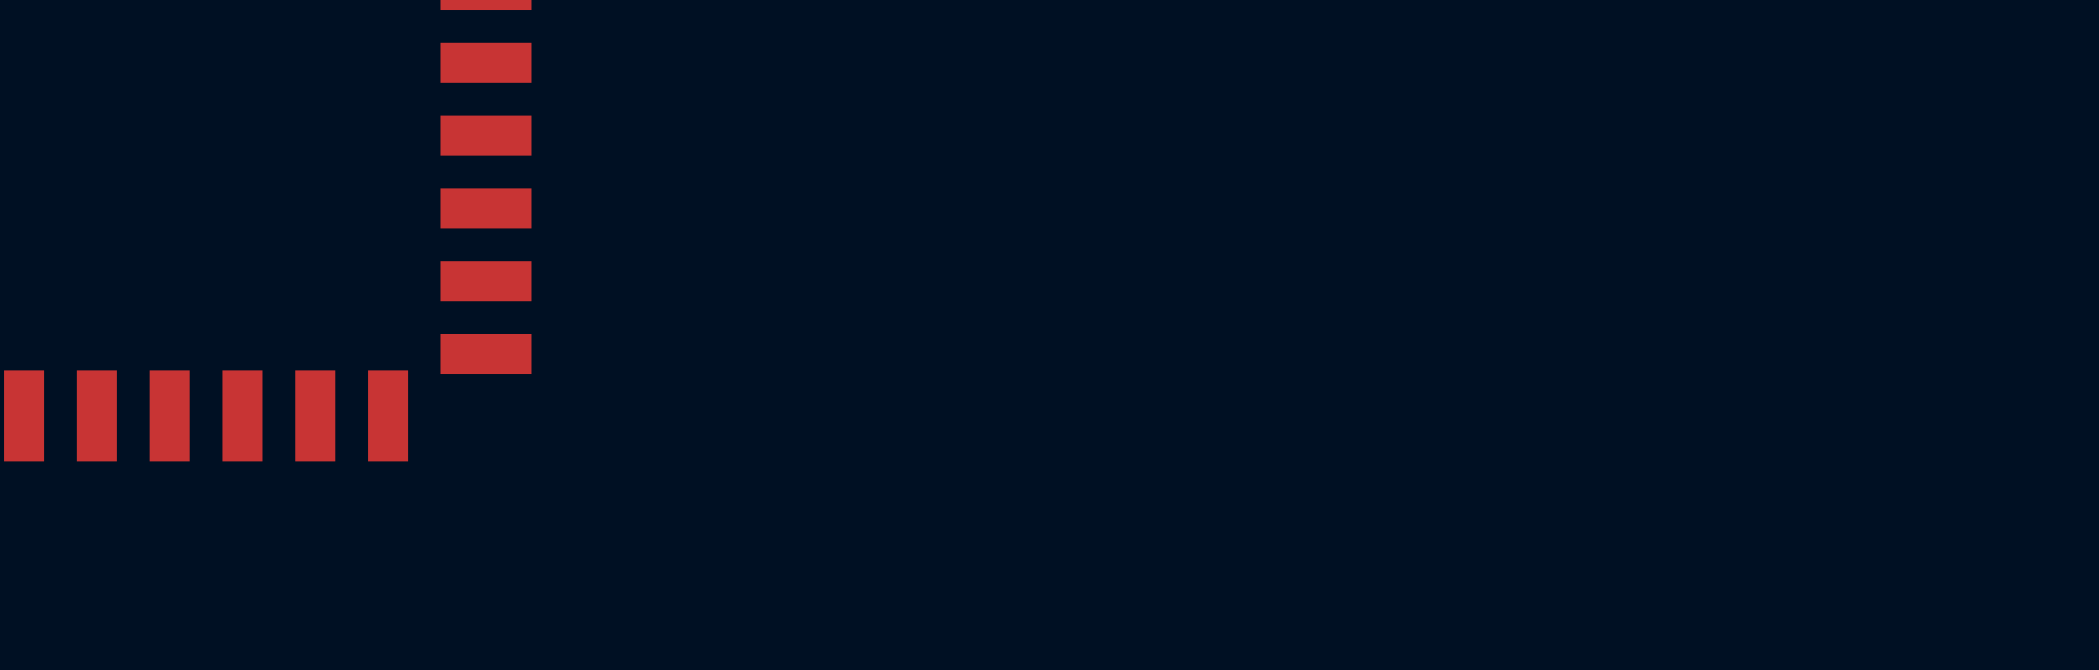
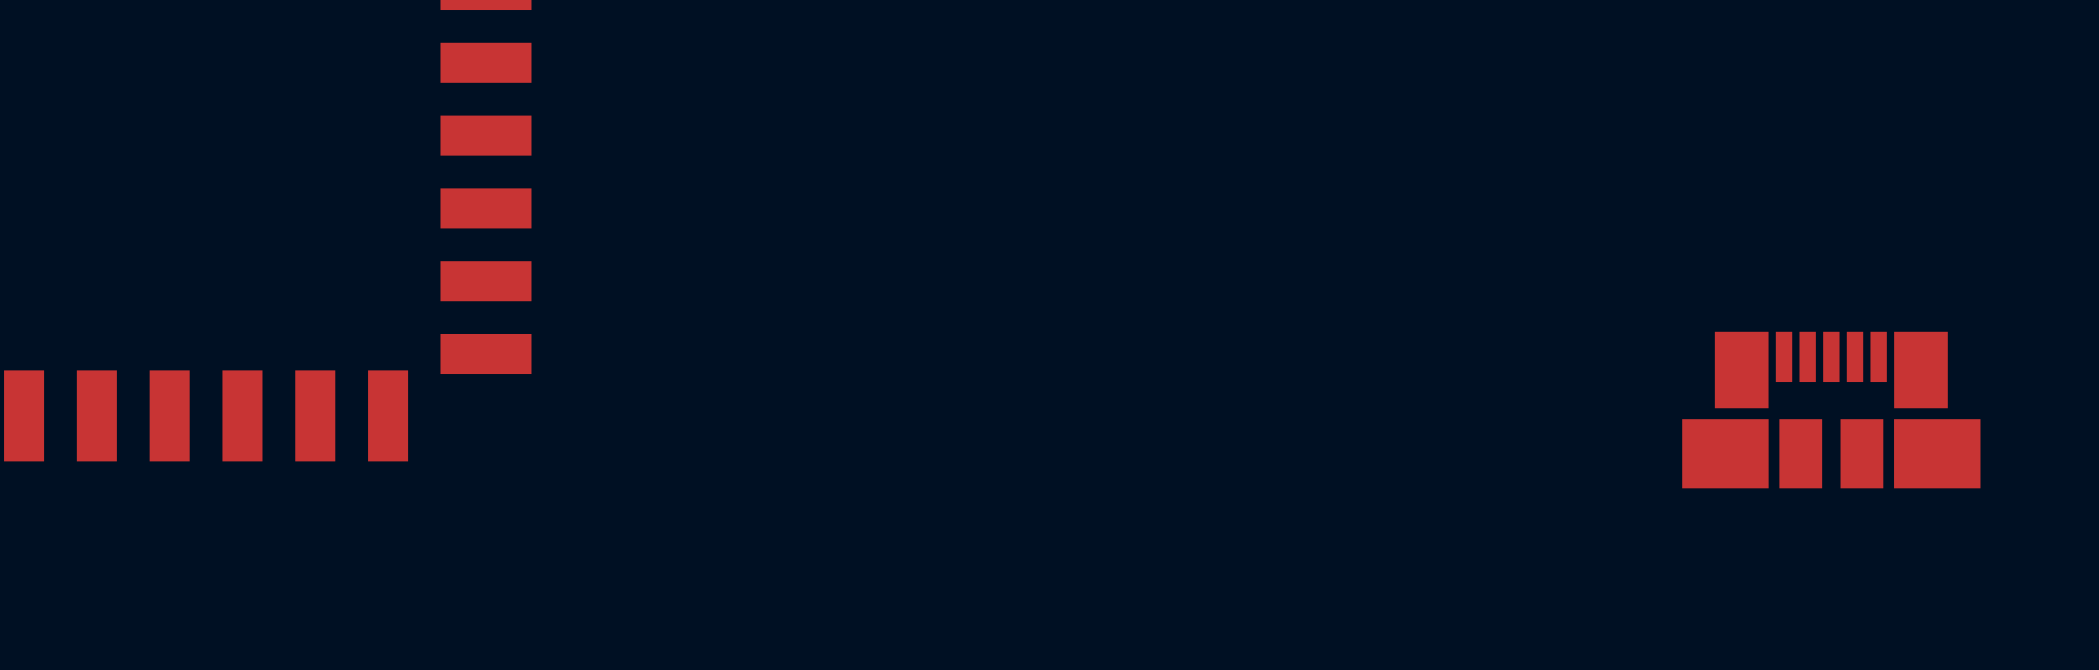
part: none -> (1831, 410)

